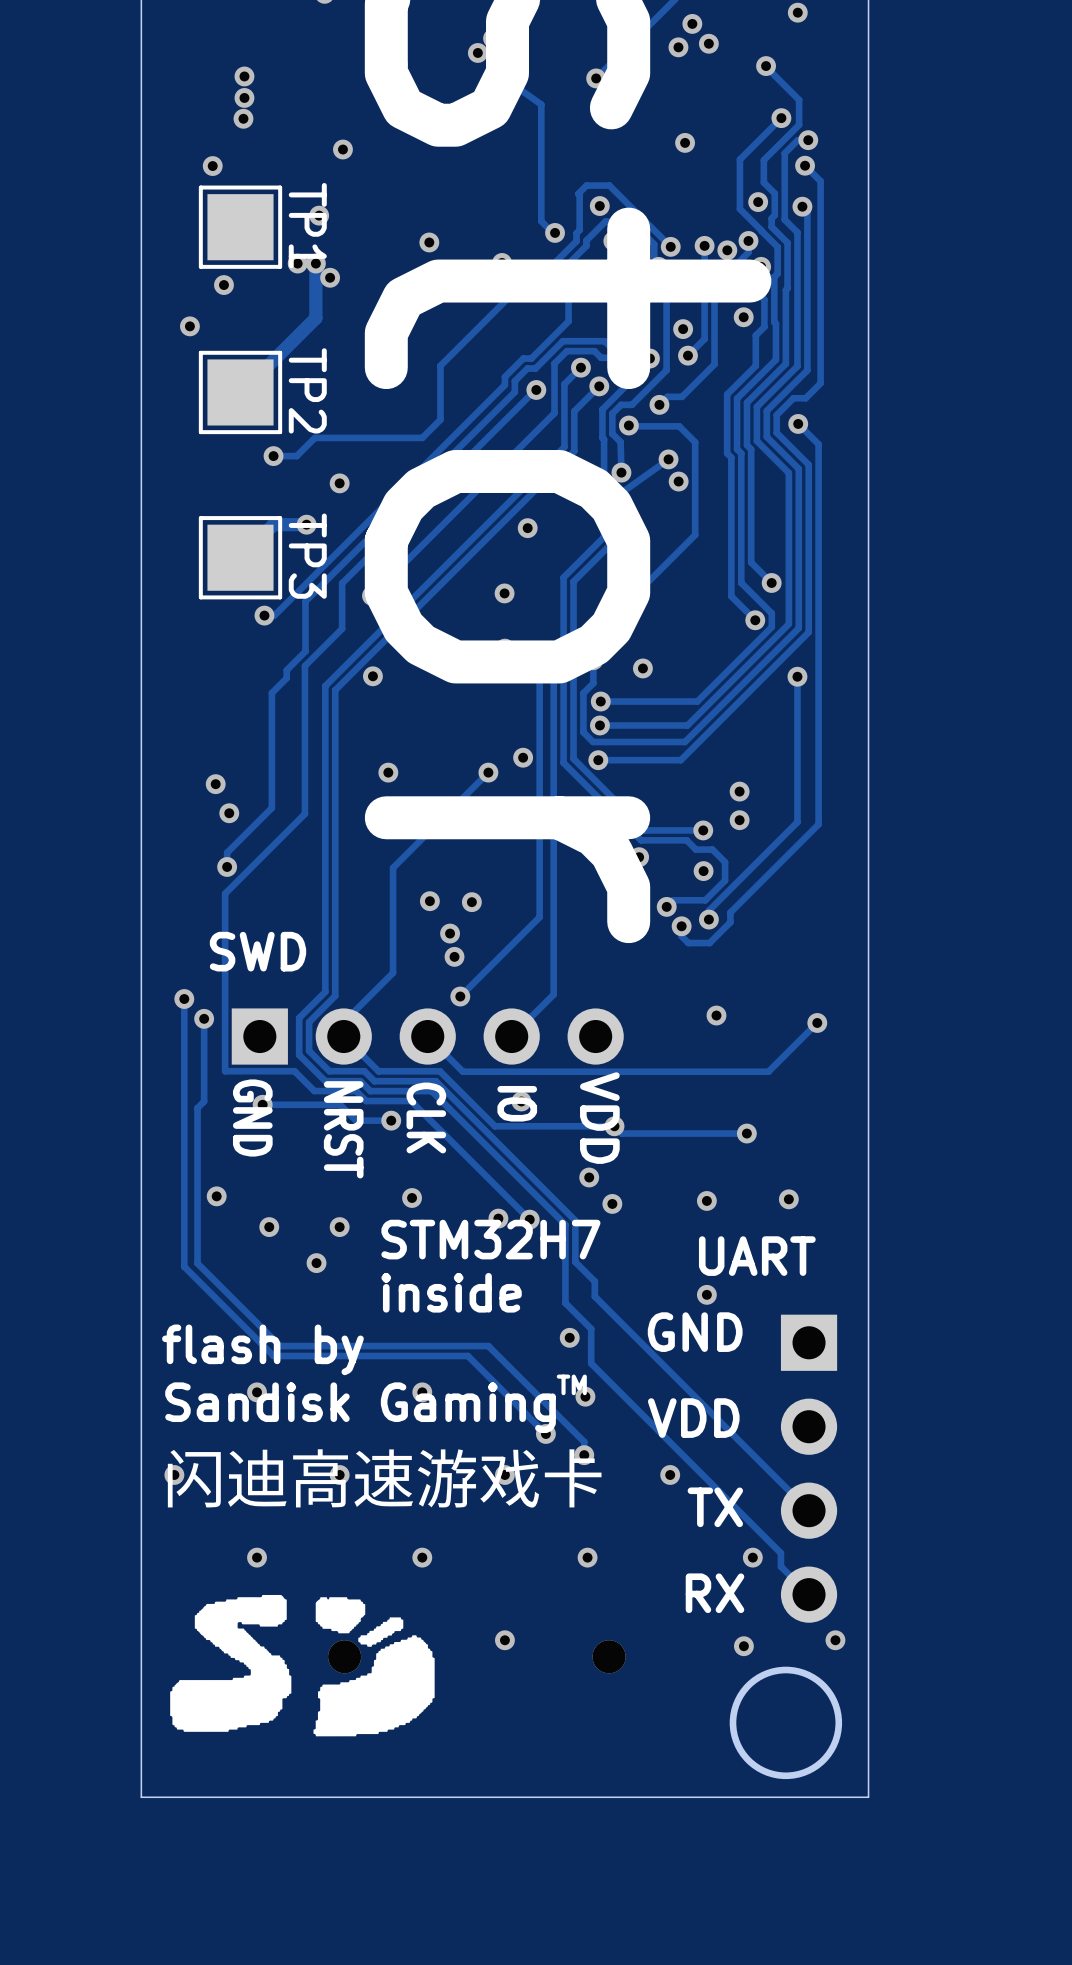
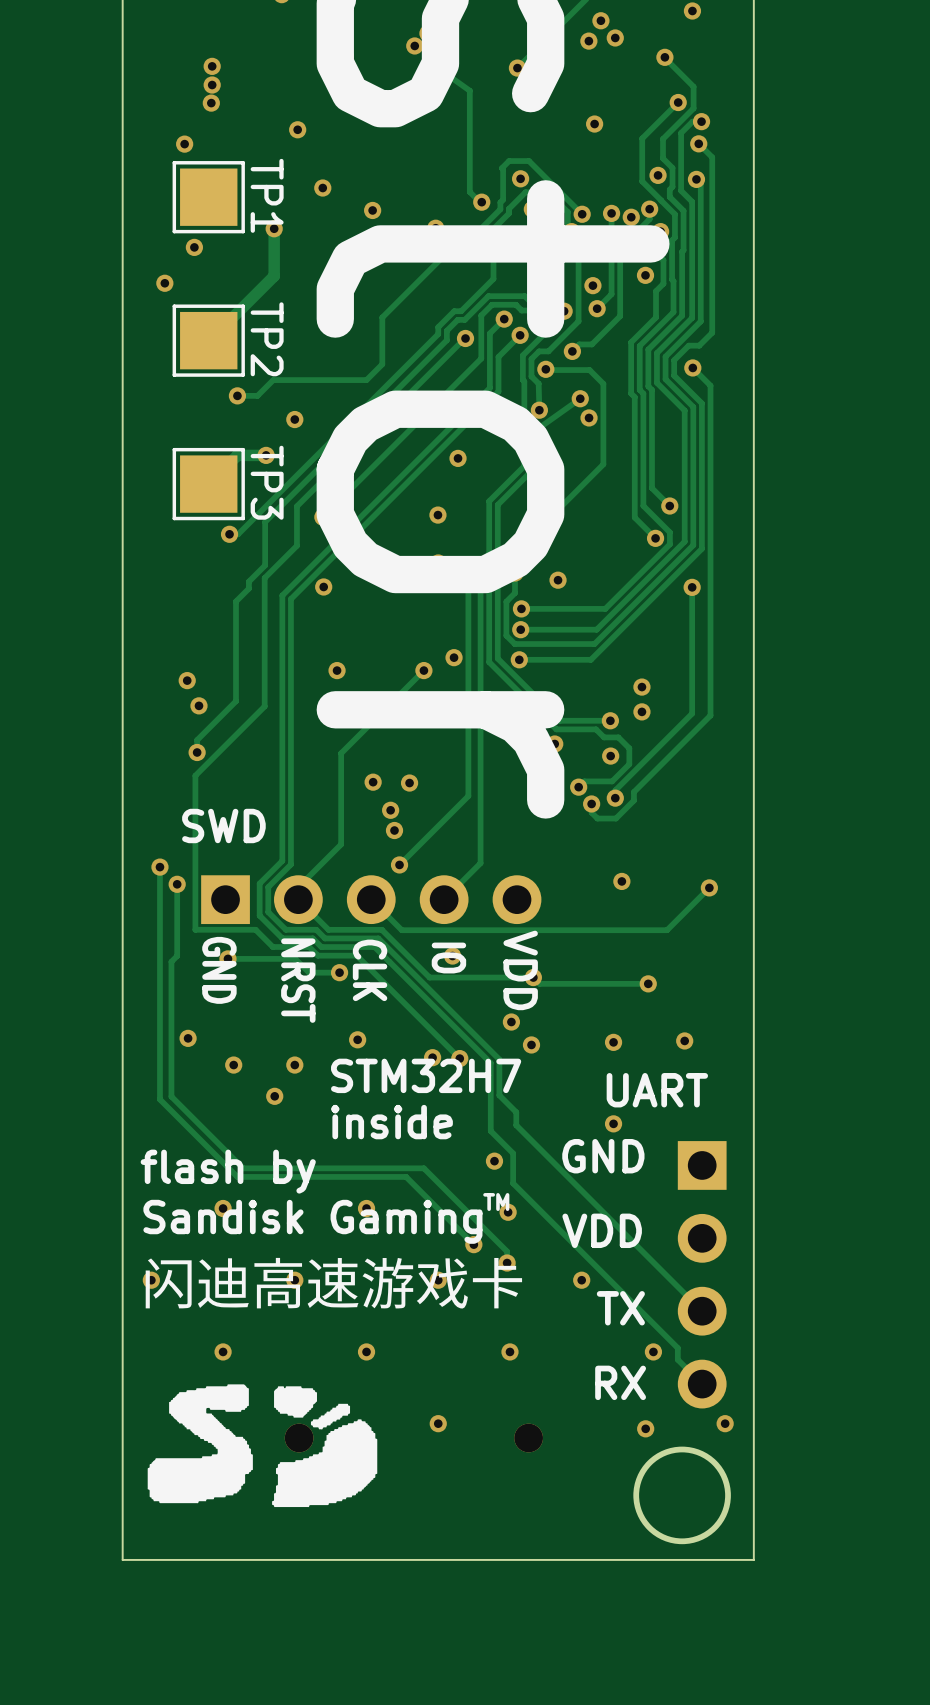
via: (319, 215) -> none
via: none -> (322, 188)
via: (297, 263) -> none
via: (330, 277) -> none

